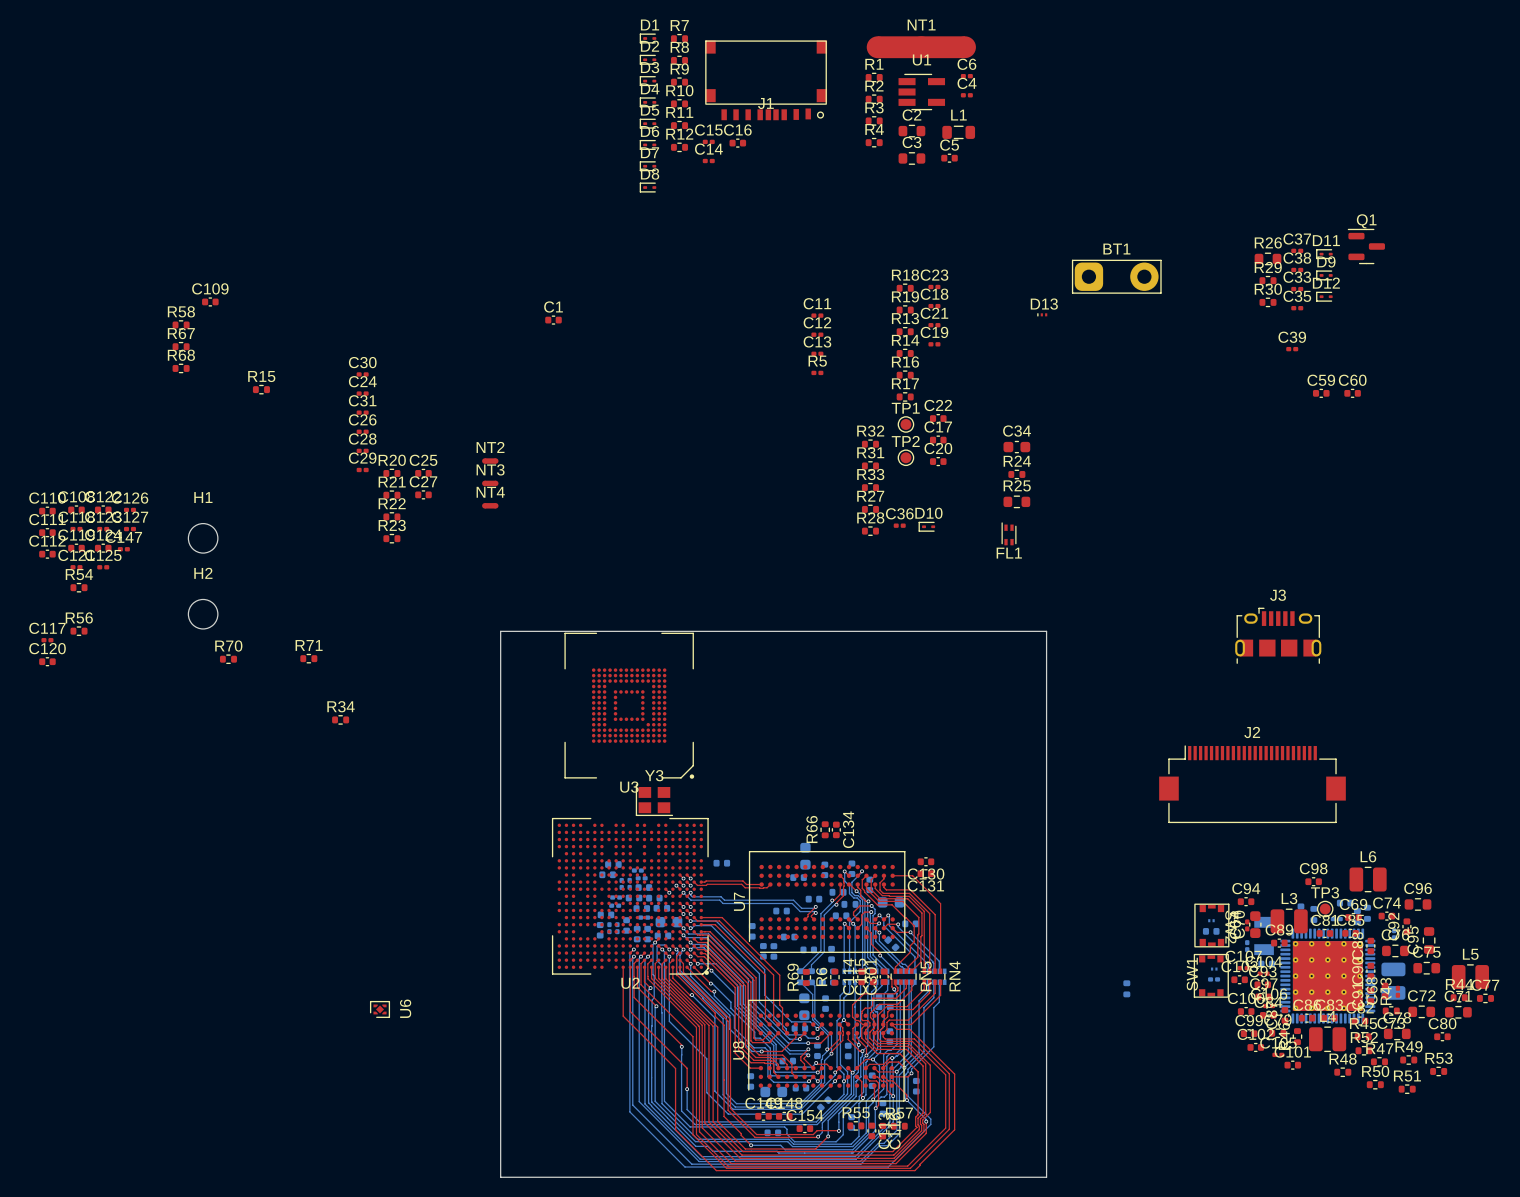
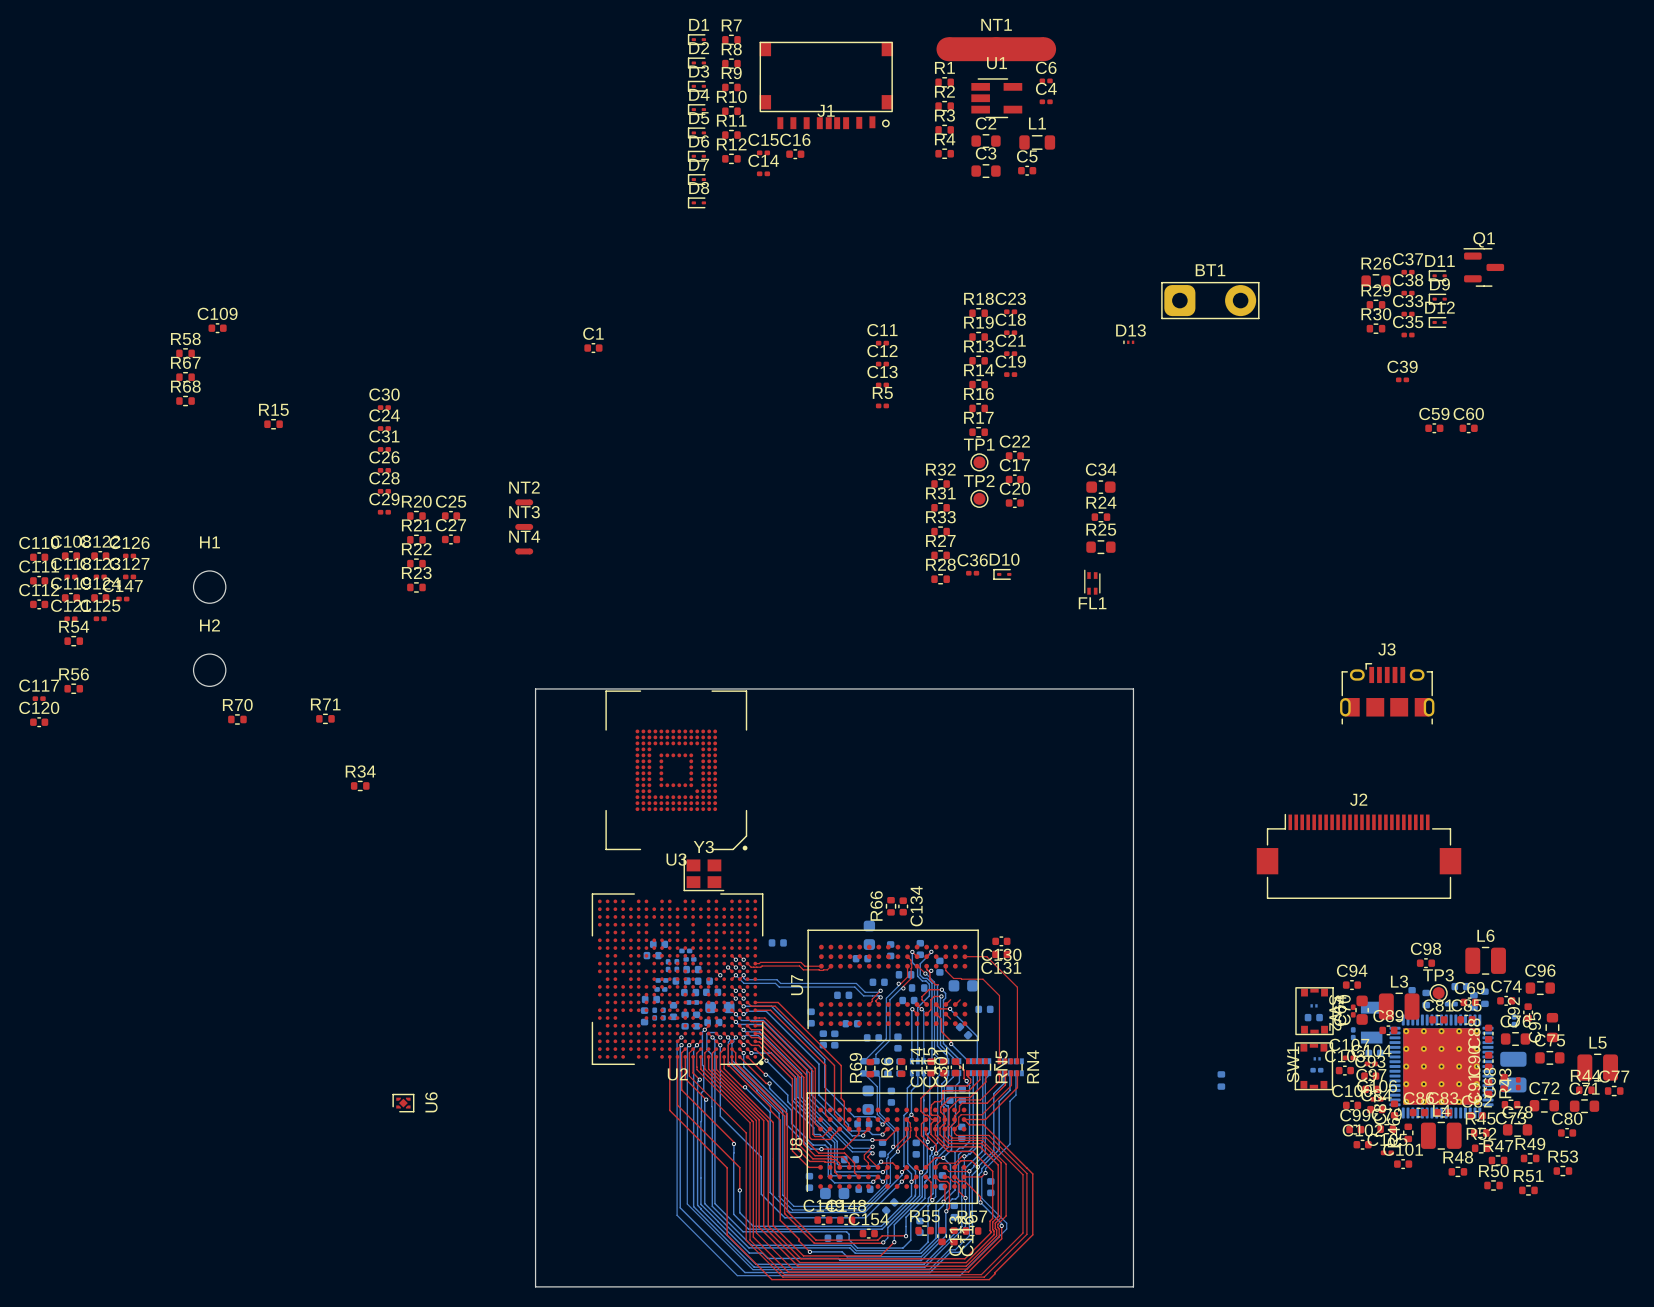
top track: (866, 875) (862, 879) (862, 888) (864, 891) (877, 904) (892, 904) (914, 925) (914, 941) (910, 945) (910, 952) (895, 967) (895, 971) -> none
top track: (875, 875) (871, 879) (871, 889) (880, 898) (907, 898) (921, 913) (920, 962) (911, 971) -> none
top track: (883, 875) (883, 878) (880, 882) (880, 890) (883, 893) (909, 893) (929, 913) (929, 971) -> none
top track: (866, 884) (866, 888) (879, 901) (902, 901) (918, 917) (917, 957) (906, 971) -> none
top track: (883, 884) (886, 889) (910, 889) (935, 914) (935, 971) -> none
via position: (868, 901) -> (931, 970)
bottom track: (879, 915) (883, 919) (883, 925) (914, 956) (914, 971) -> none
via: (879, 915) -> none
bottom track: (888, 915) (889, 925) (928, 964) (928, 971) -> none
via: (888, 915) -> none
bottom track: (879, 923) (875, 926) (875, 941) (904, 968) -> (950, 1008) (977, 1036) (977, 1058)
top track: (898, 924) (887, 924) (883, 928) -> none
bottom track: (898, 924) (898, 927) (932, 961) (933, 971) -> none
via: (898, 924) -> none
top track: (892, 928) (896, 932) (910, 932) -> none
bottom track: (879, 932) (879, 941) (902, 964) (905, 964) (909, 971) -> none
via: (879, 932) -> none
bottom track: (910, 932) (939, 961) (939, 971) -> none
via: (910, 932) -> none

